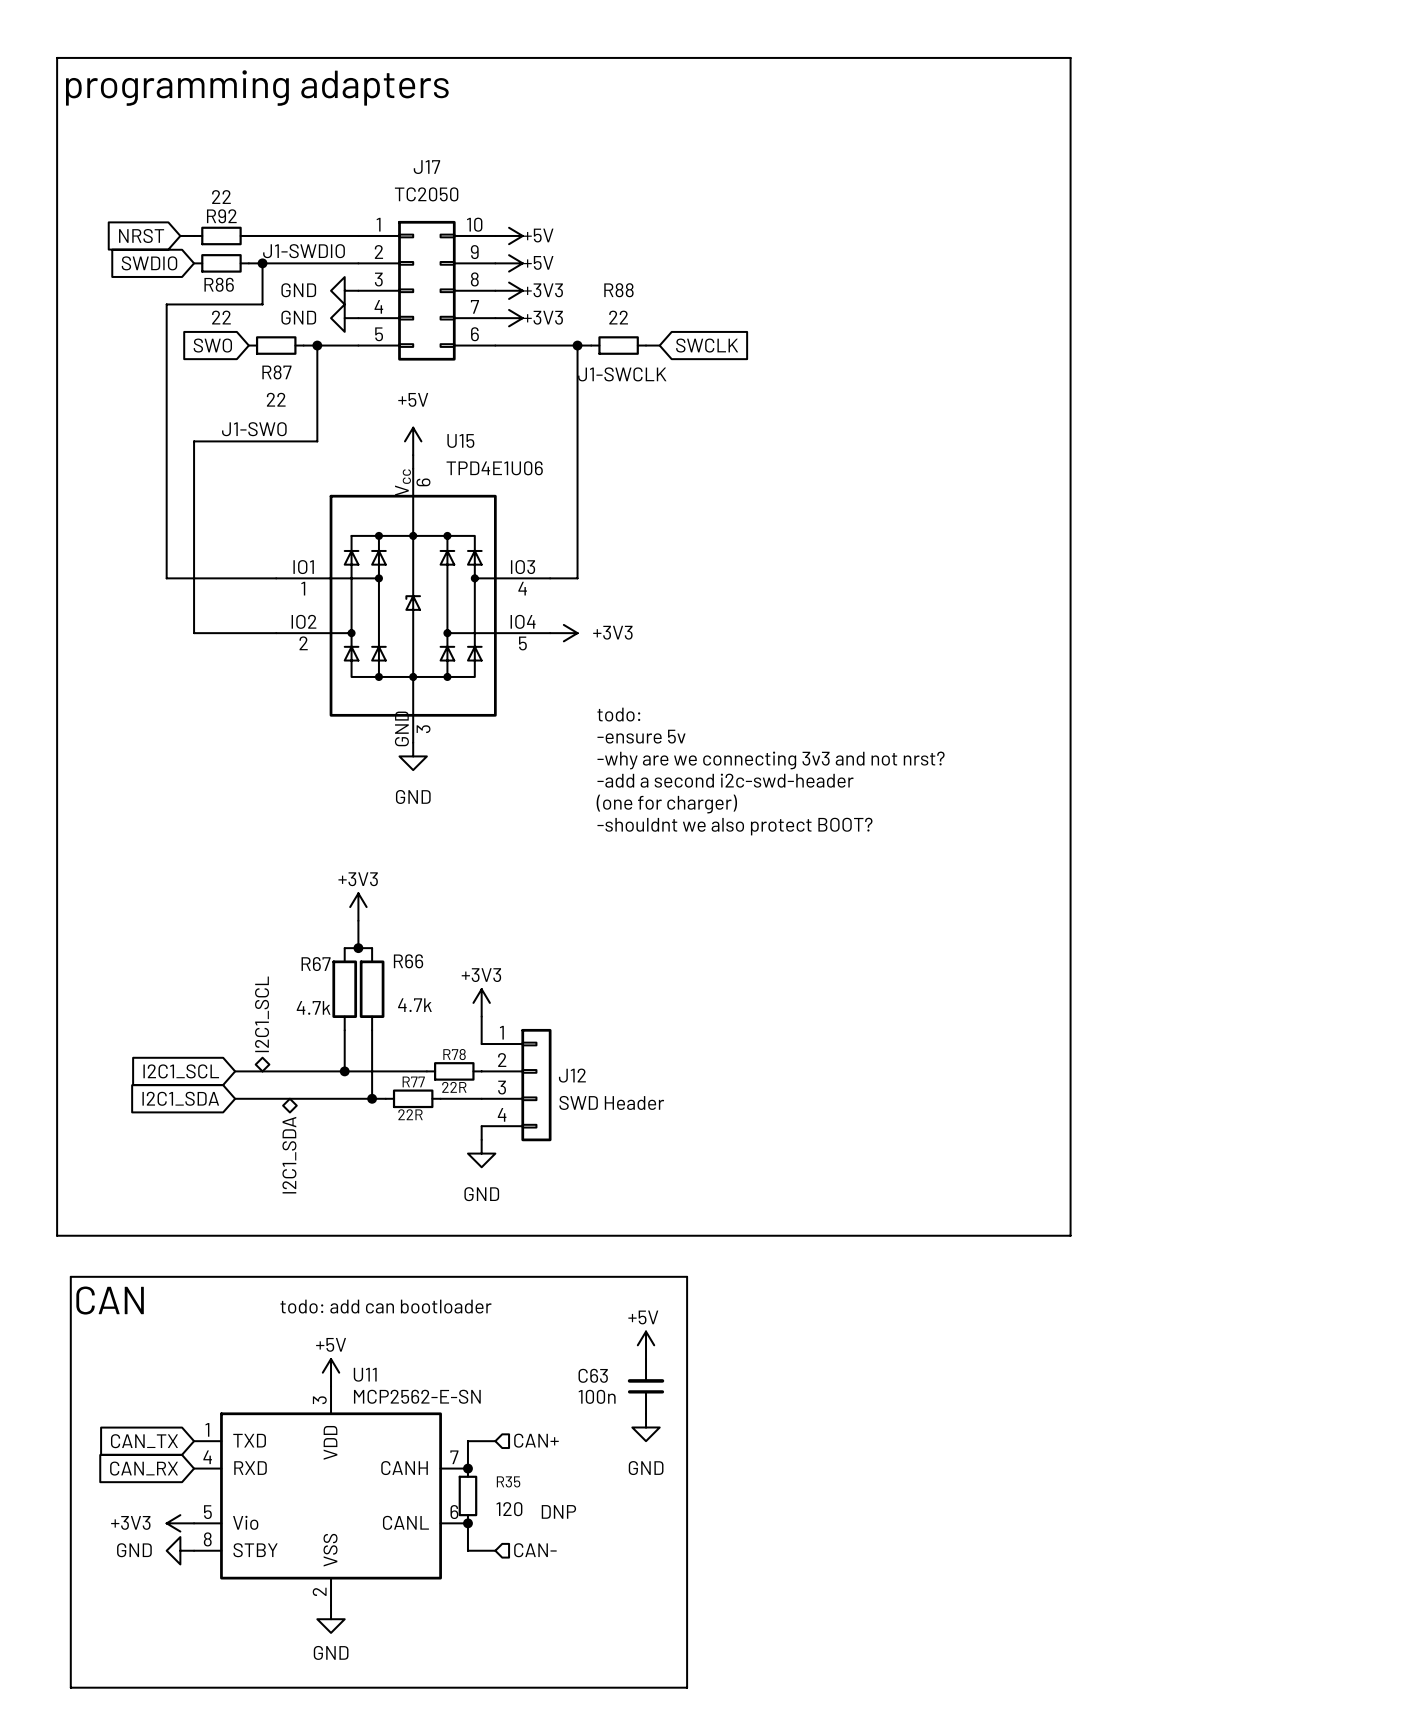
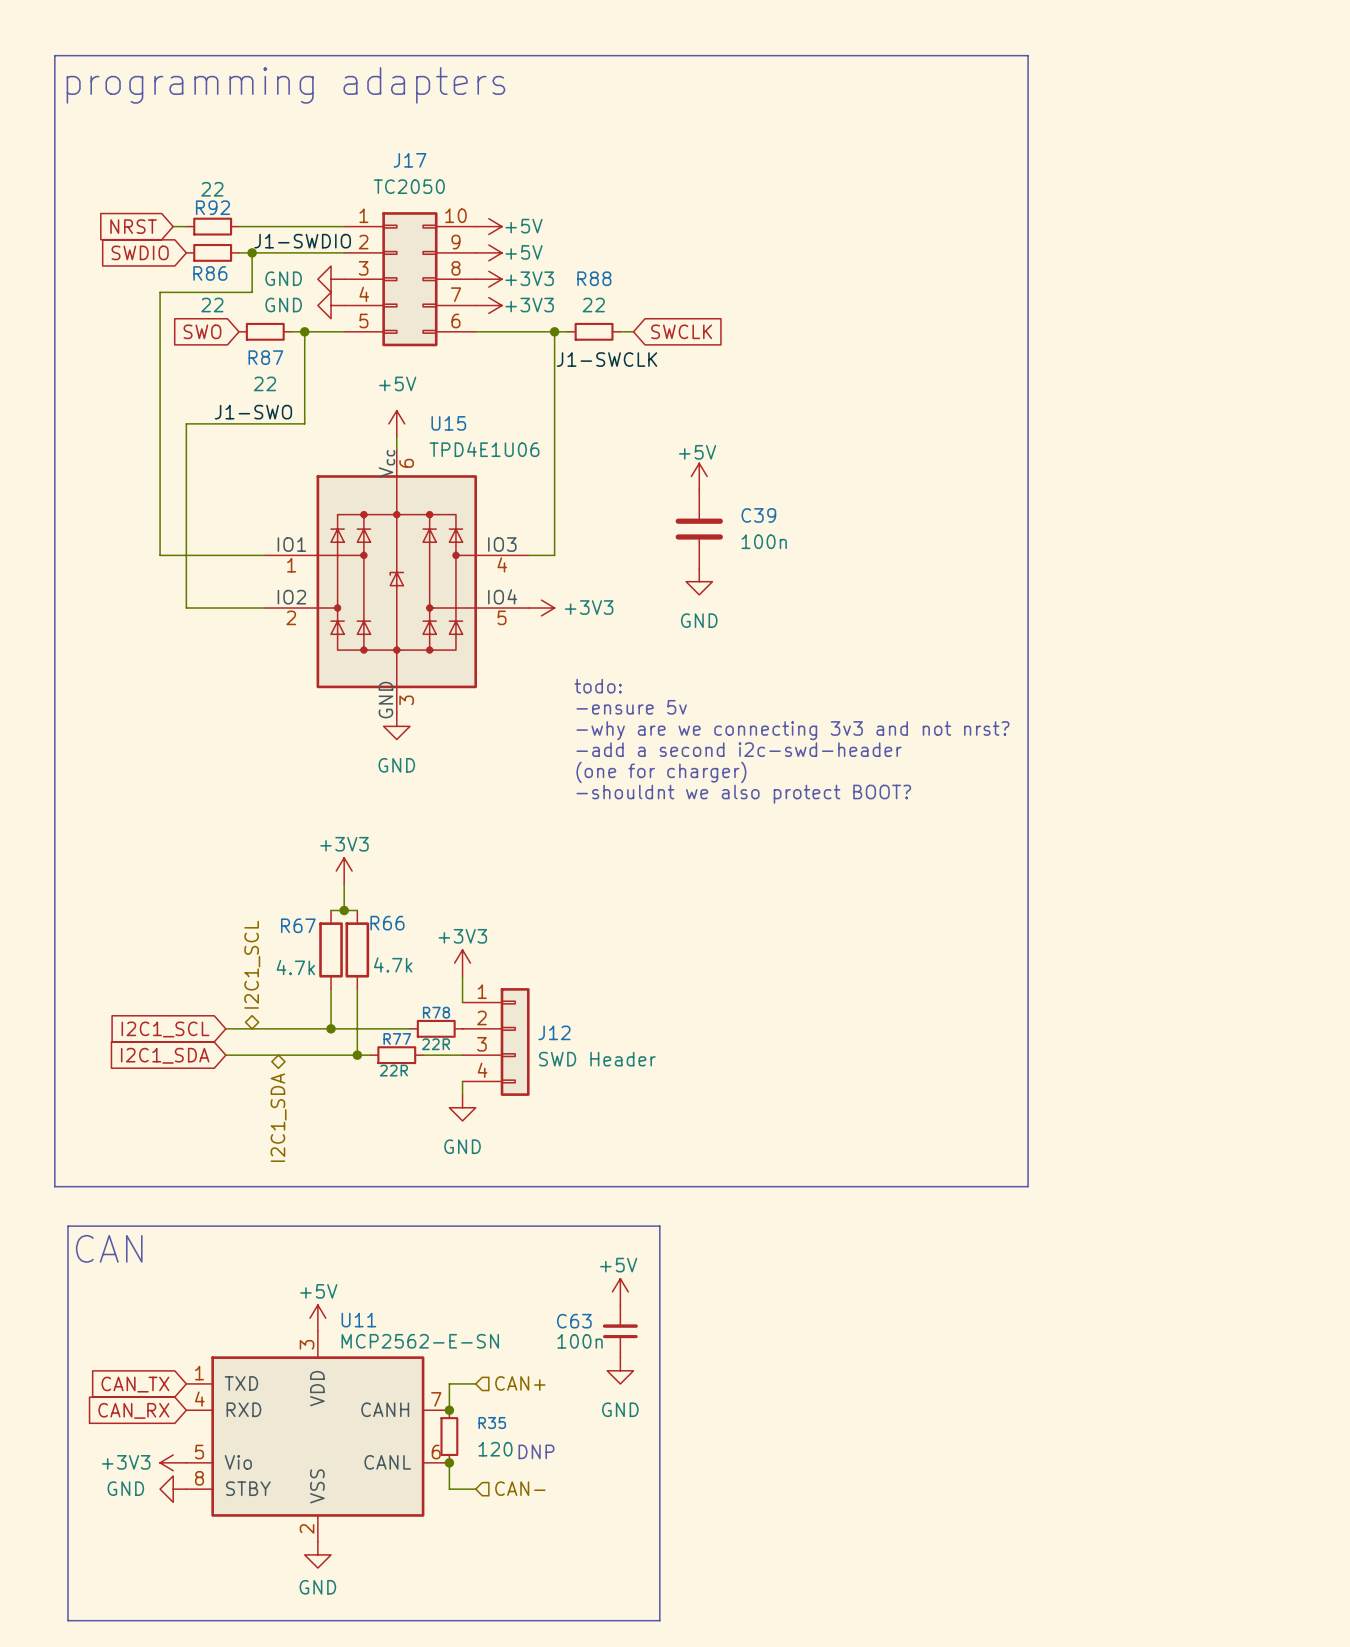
power symbol: none -> +5V (699, 476)
C39: none -> 100n (699, 529)
power symbol: none -> GND (699, 581)
text: todo: add can bootloader (386, 1306) -> none

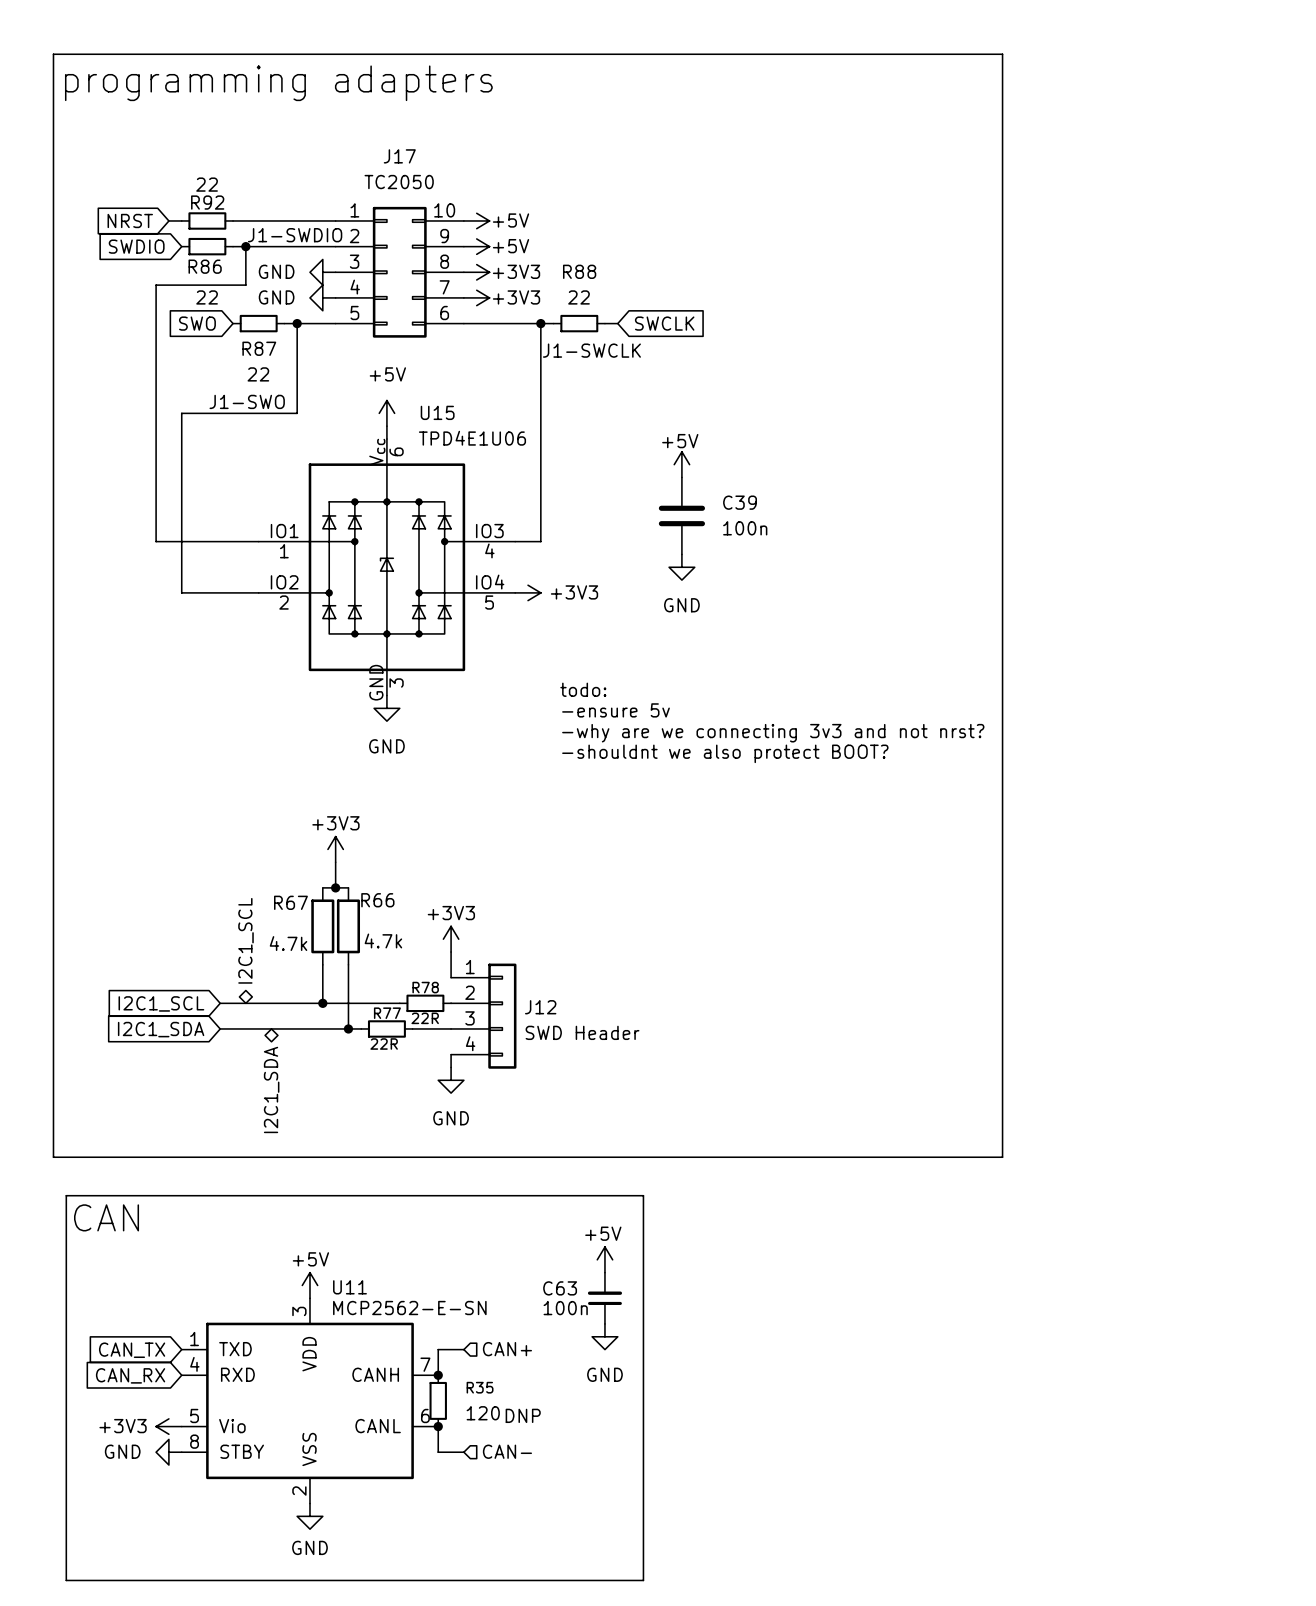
text: todo: (598, 686) -> none
text: -ensure 5v (631, 707) -> todo: (583, 689)
text: -why are we connecting 3v3 and not nrst? (792, 730) -> -ensure 5v (616, 710)
text: -add a second i2c-swd-header (739, 749) -> -why are we connecting 3v3 and not nrst? (773, 733)
text: (one for charger) (661, 772) -> -shouldnt we also protect BOOT? (725, 753)
text: -shouldnt we also protect BOOT? (743, 794) -> none

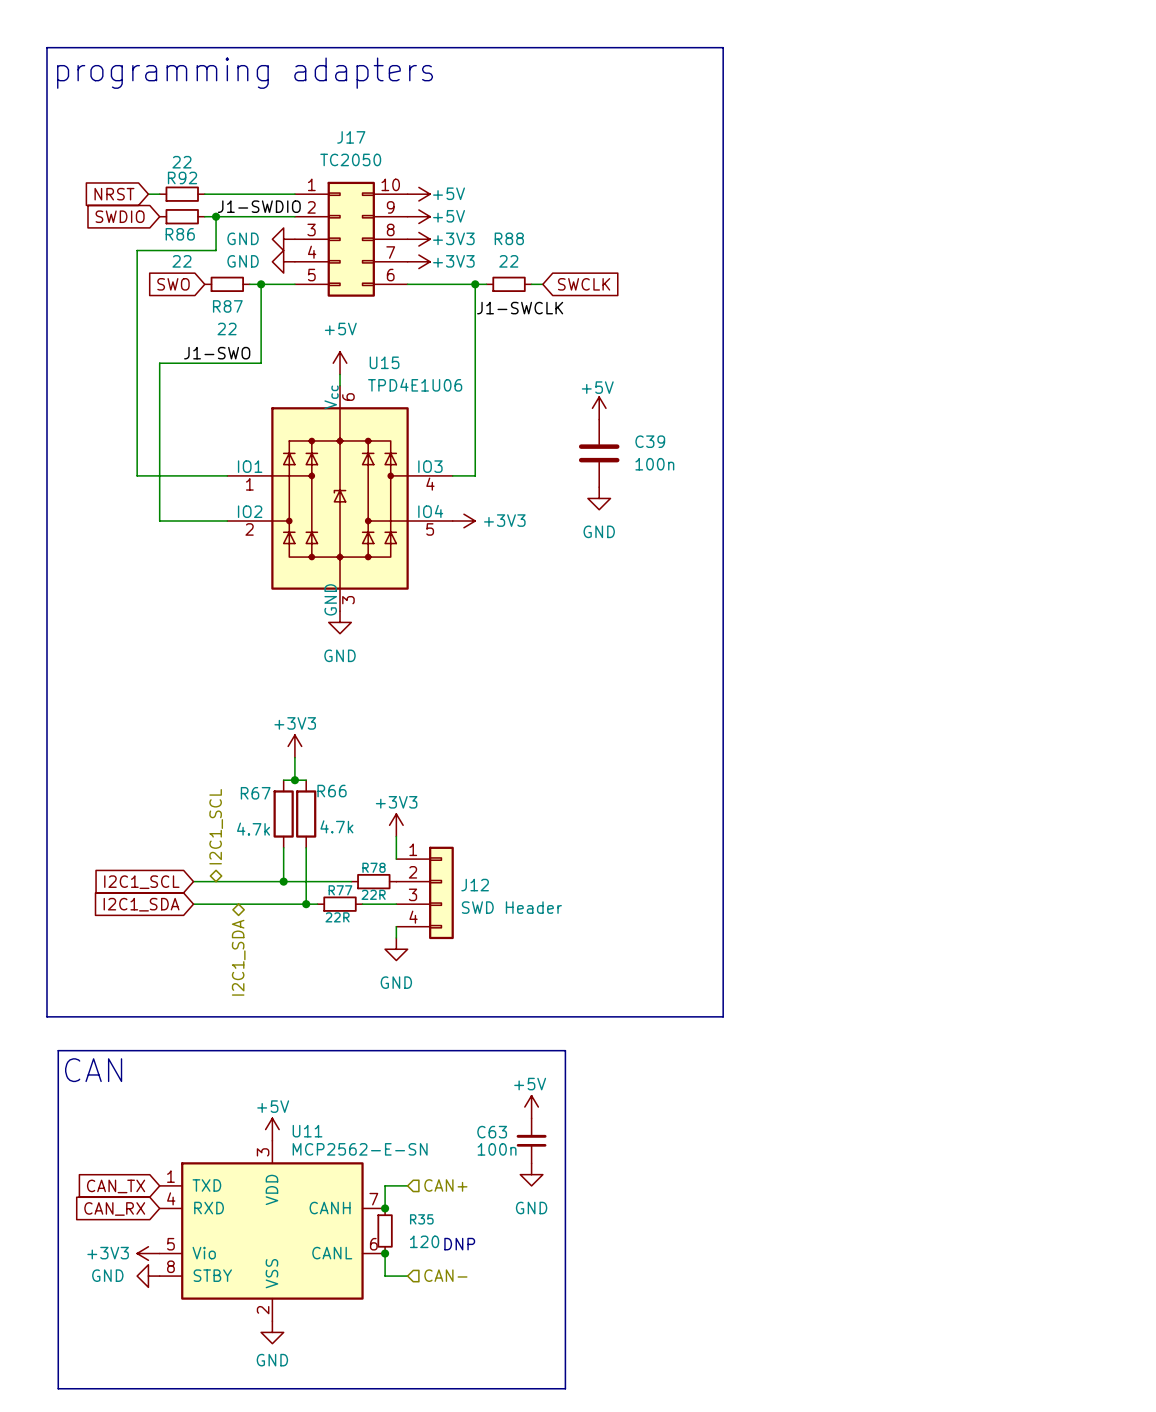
line: (823, 54) (1002, 54) (1002, 1157) (823, 1157) -> (723, 47) (723, 1016)
text: todo: (583, 689) -> none
text: -ensure 5v (616, 710) -> none
text: -why are we connecting 3v3 and not nrst? (773, 733) -> none
text: -shouldnt we also protect BOOT? (725, 753) -> none

